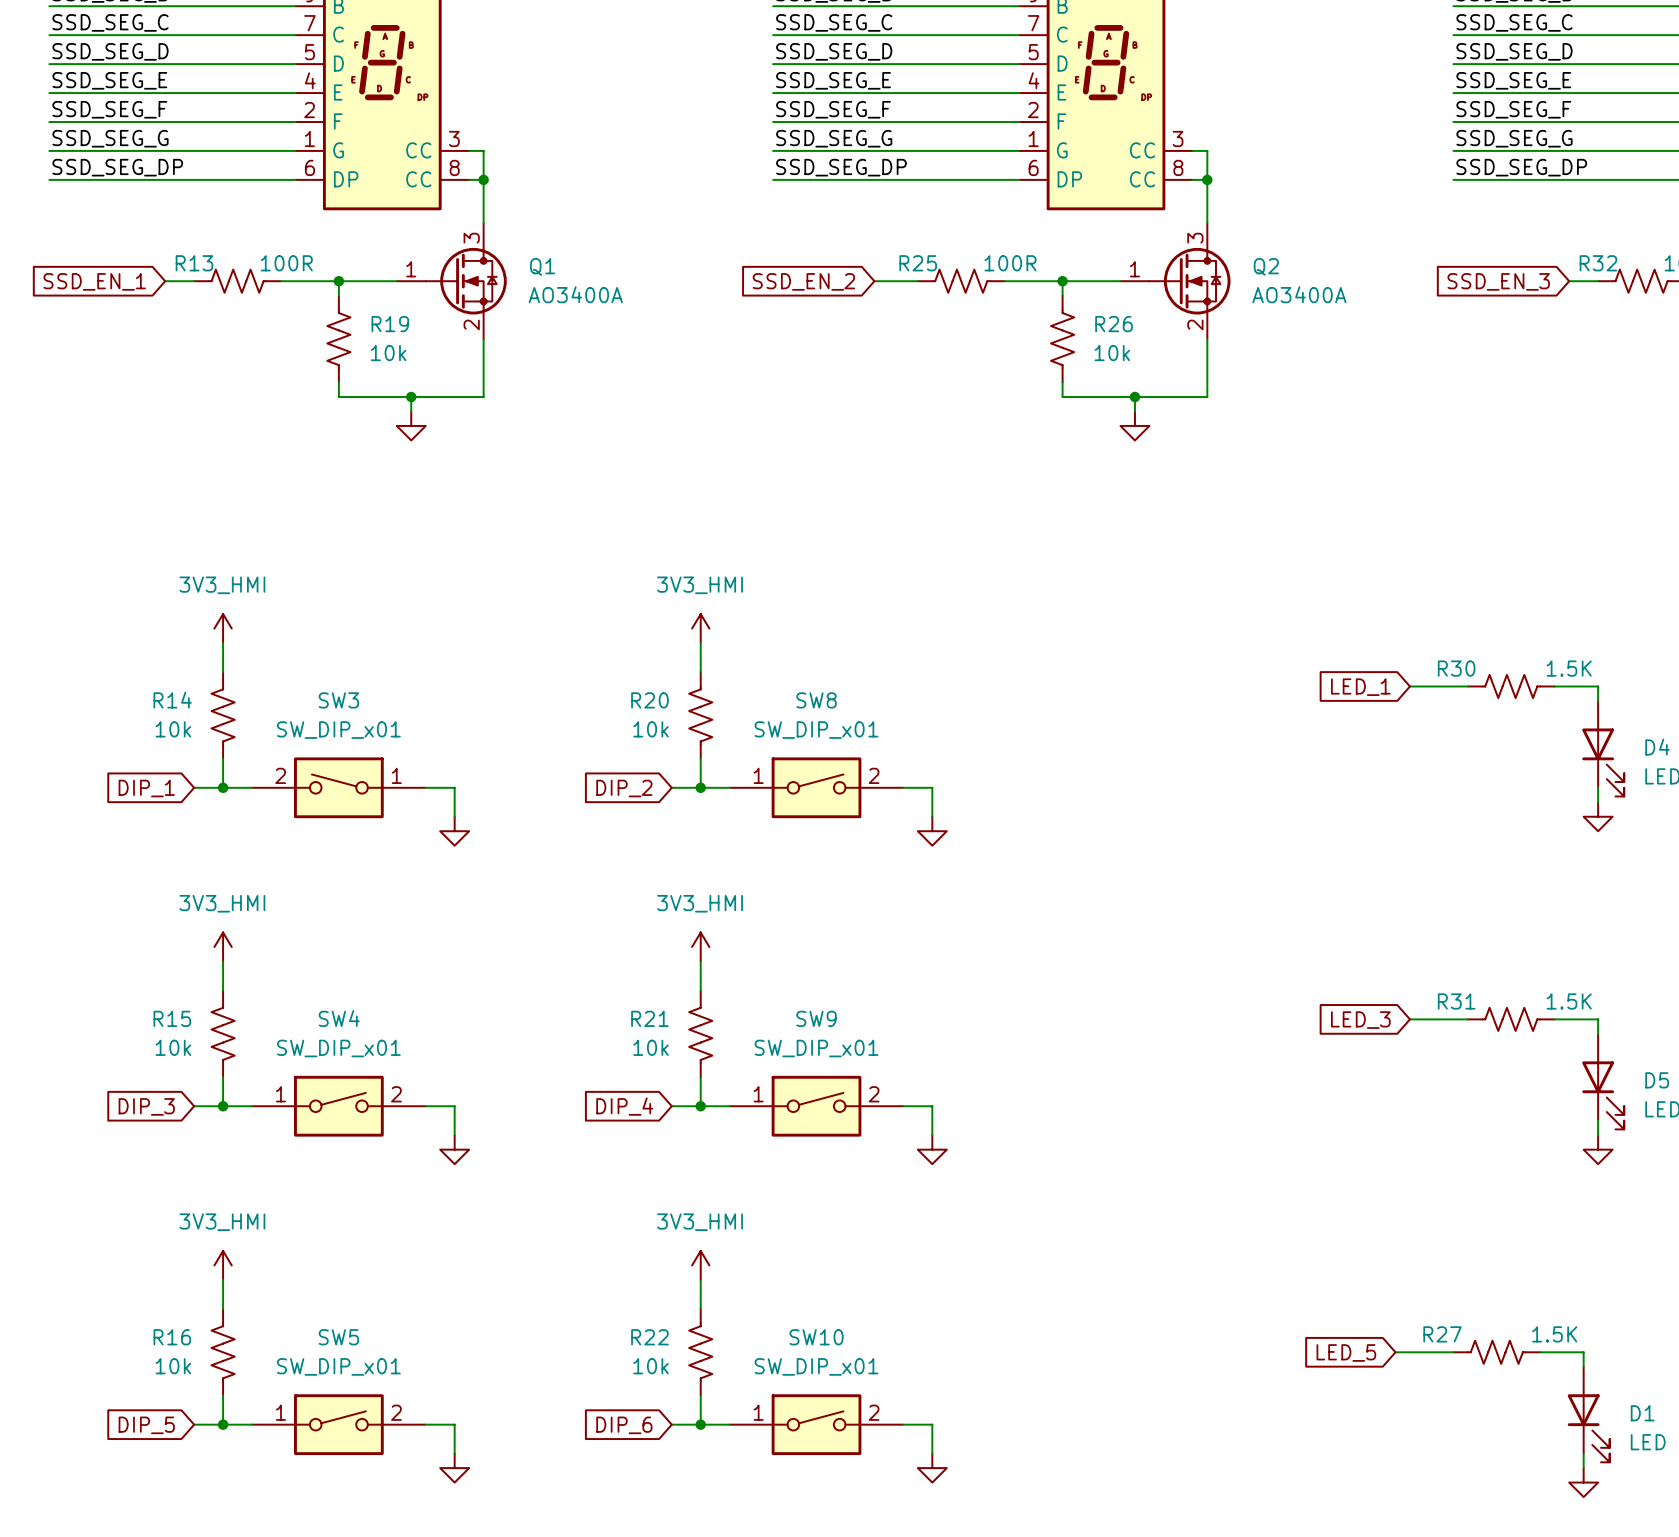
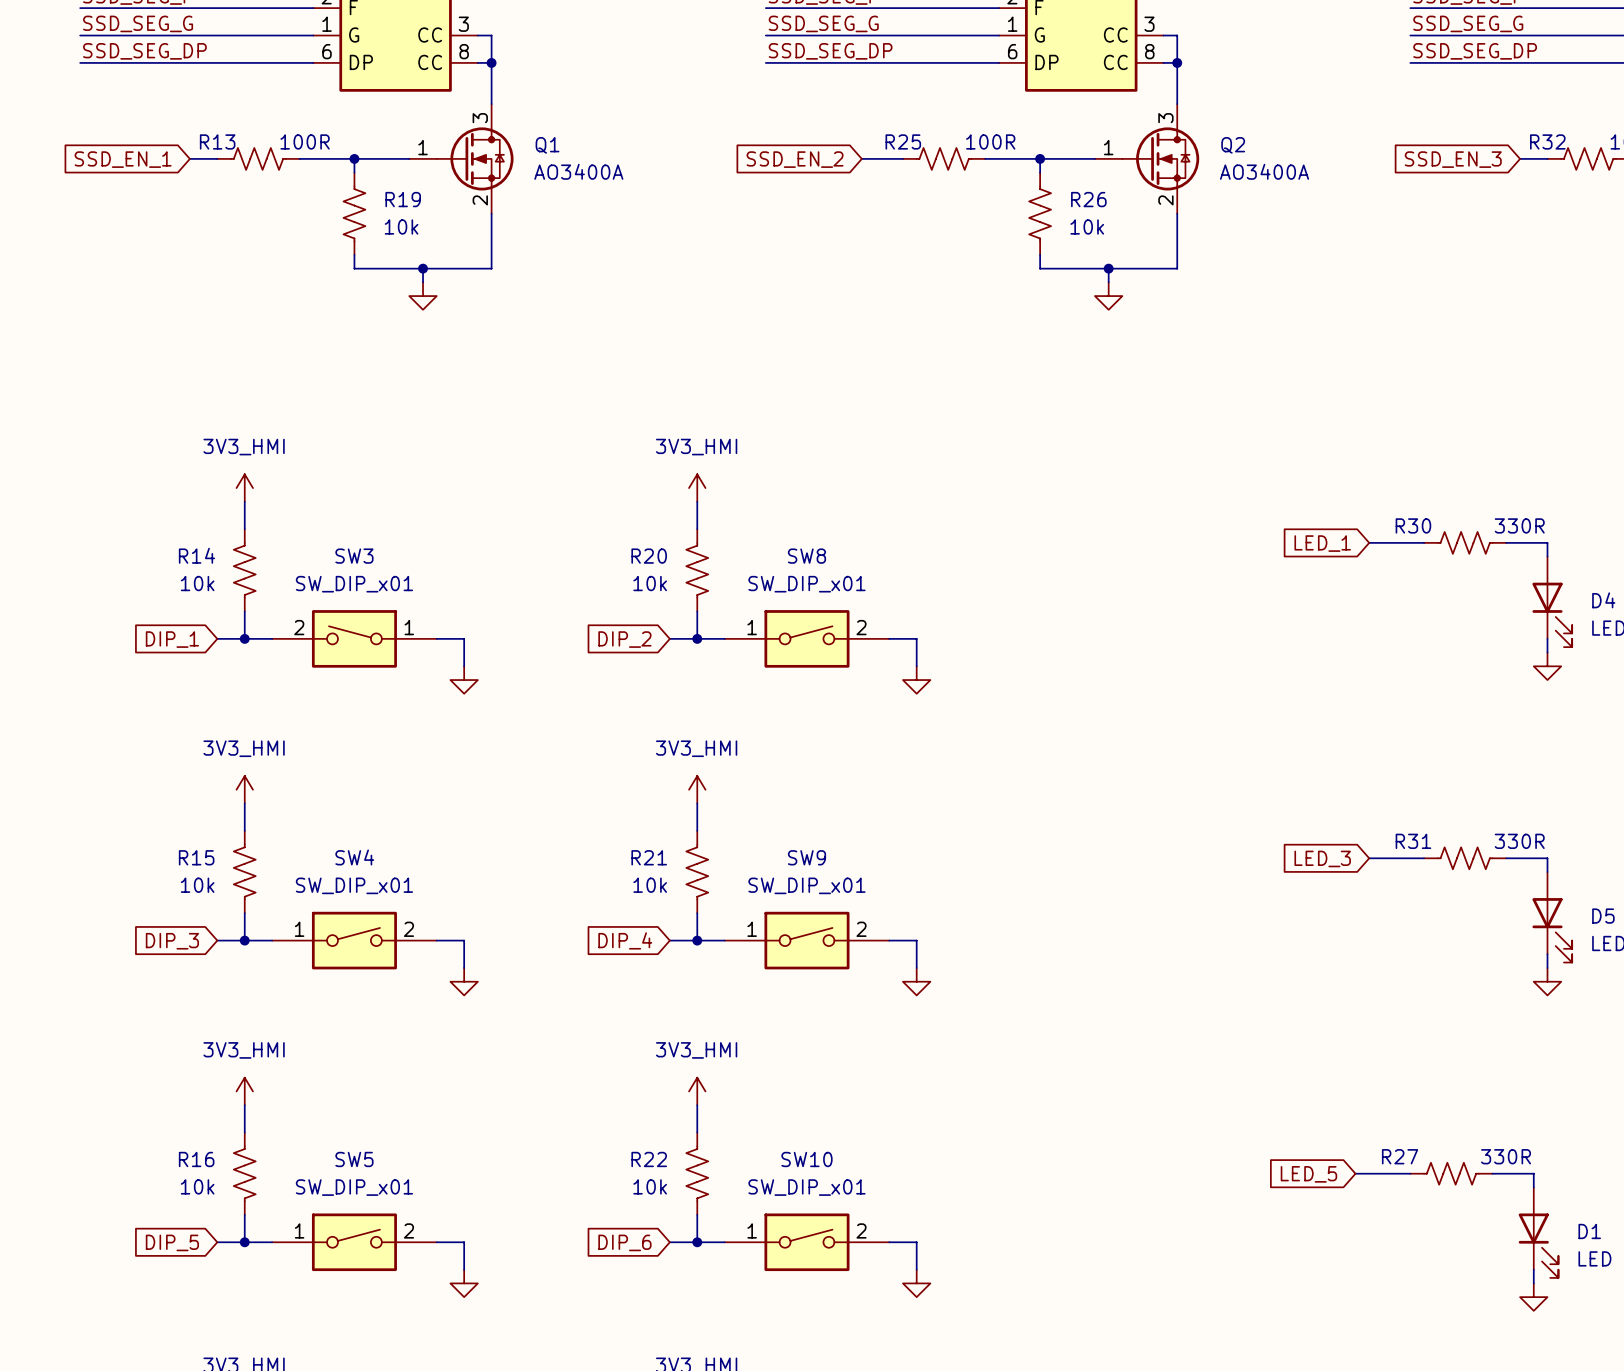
R30 value: 1.5K (1569, 668) -> 330R (1519, 525)
R31 value: 1.5K (1569, 1001) -> 330R (1519, 841)
R27 value: 1.5K (1554, 1334) -> 330R (1506, 1156)

